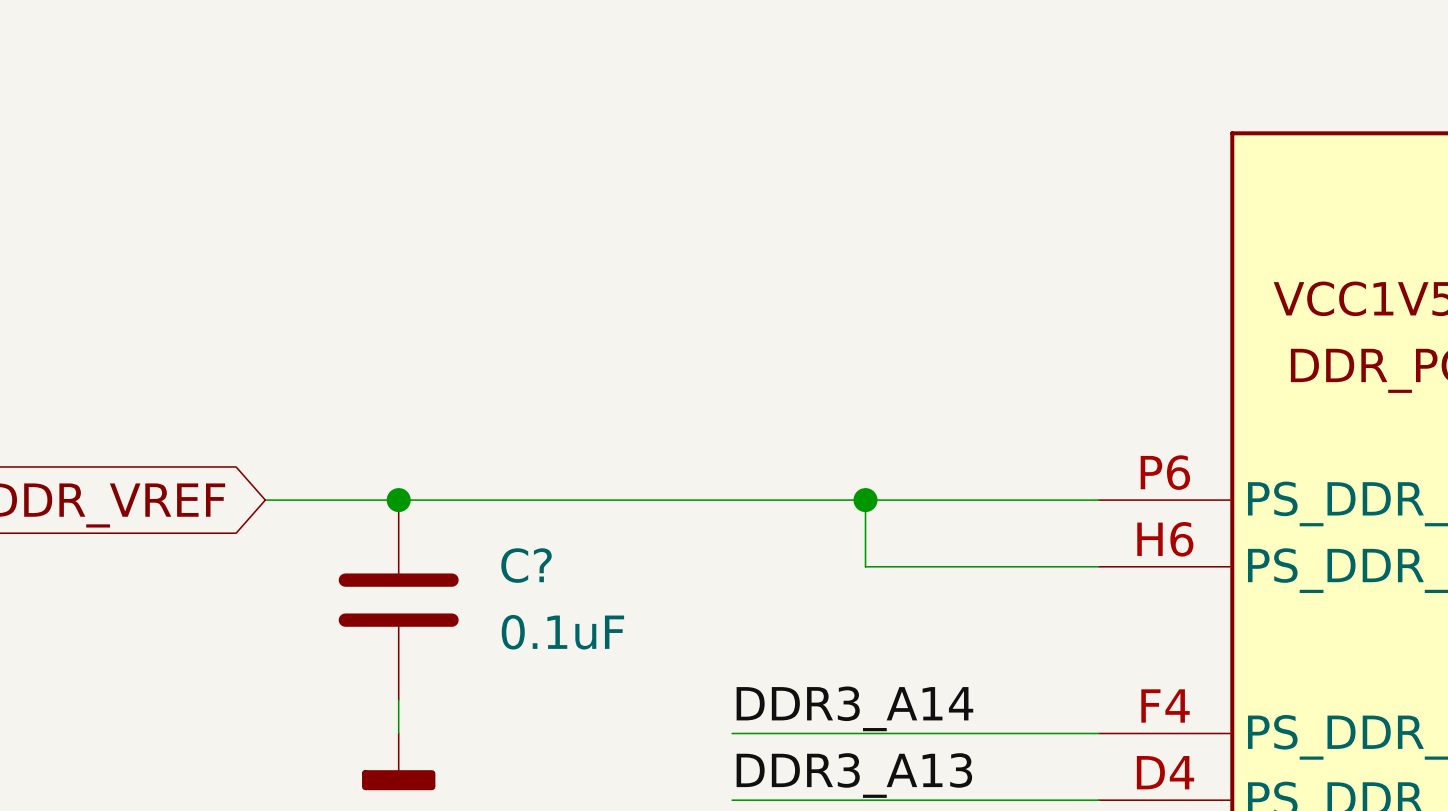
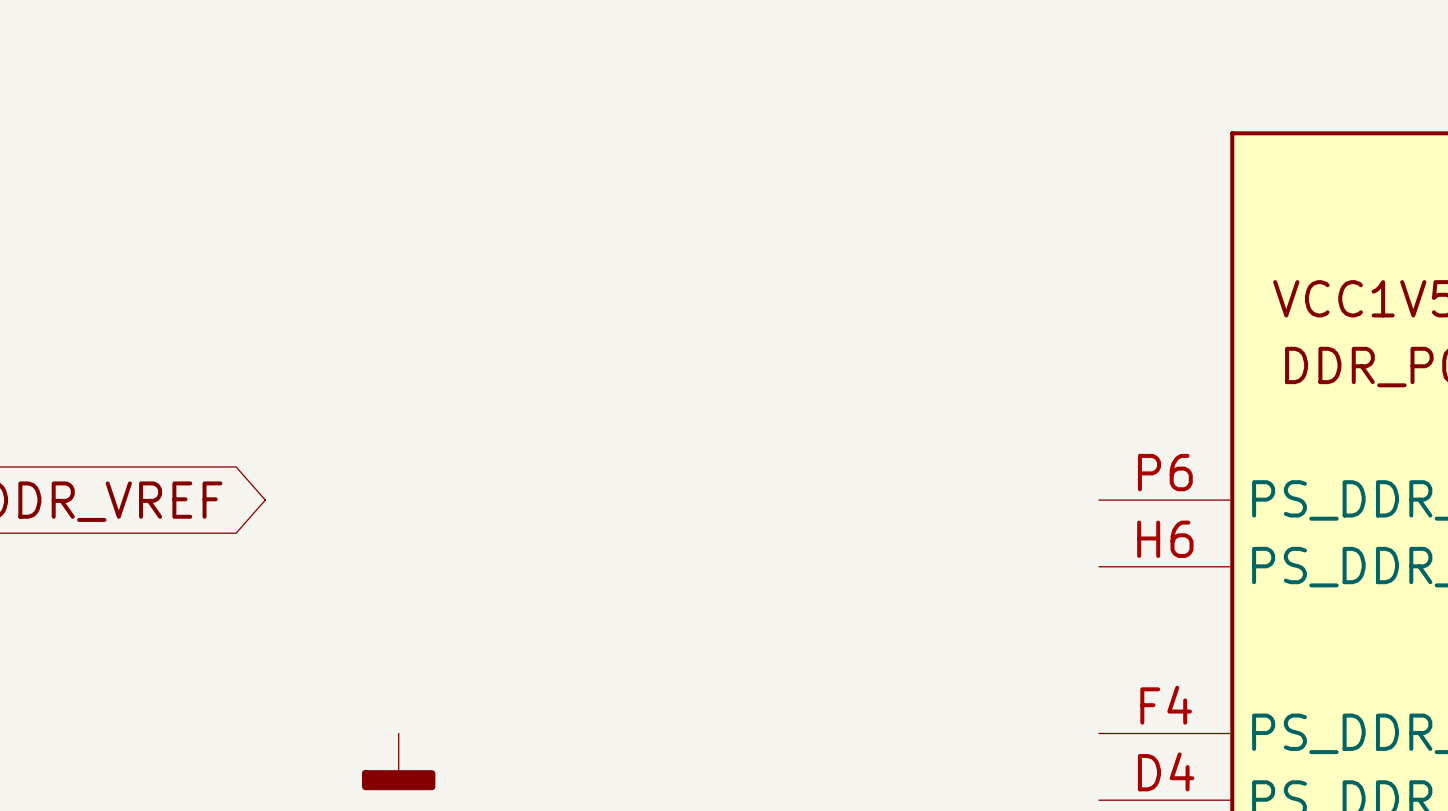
wire: (265, 500) (1098, 500) -> none
junction: (398, 500) -> none
wire: (865, 500) (865, 566) (1098, 566) -> none
junction: (865, 500) -> none
C?: 0.1uF (398, 600) -> none
wire: (398, 700) (398, 733) -> none
label: DDR3_A14 (854, 708) -> none
wire: (732, 733) (1098, 733) -> none
label: DDR3_A13 (854, 775) -> none
wire: (732, 800) (1098, 800) -> none

